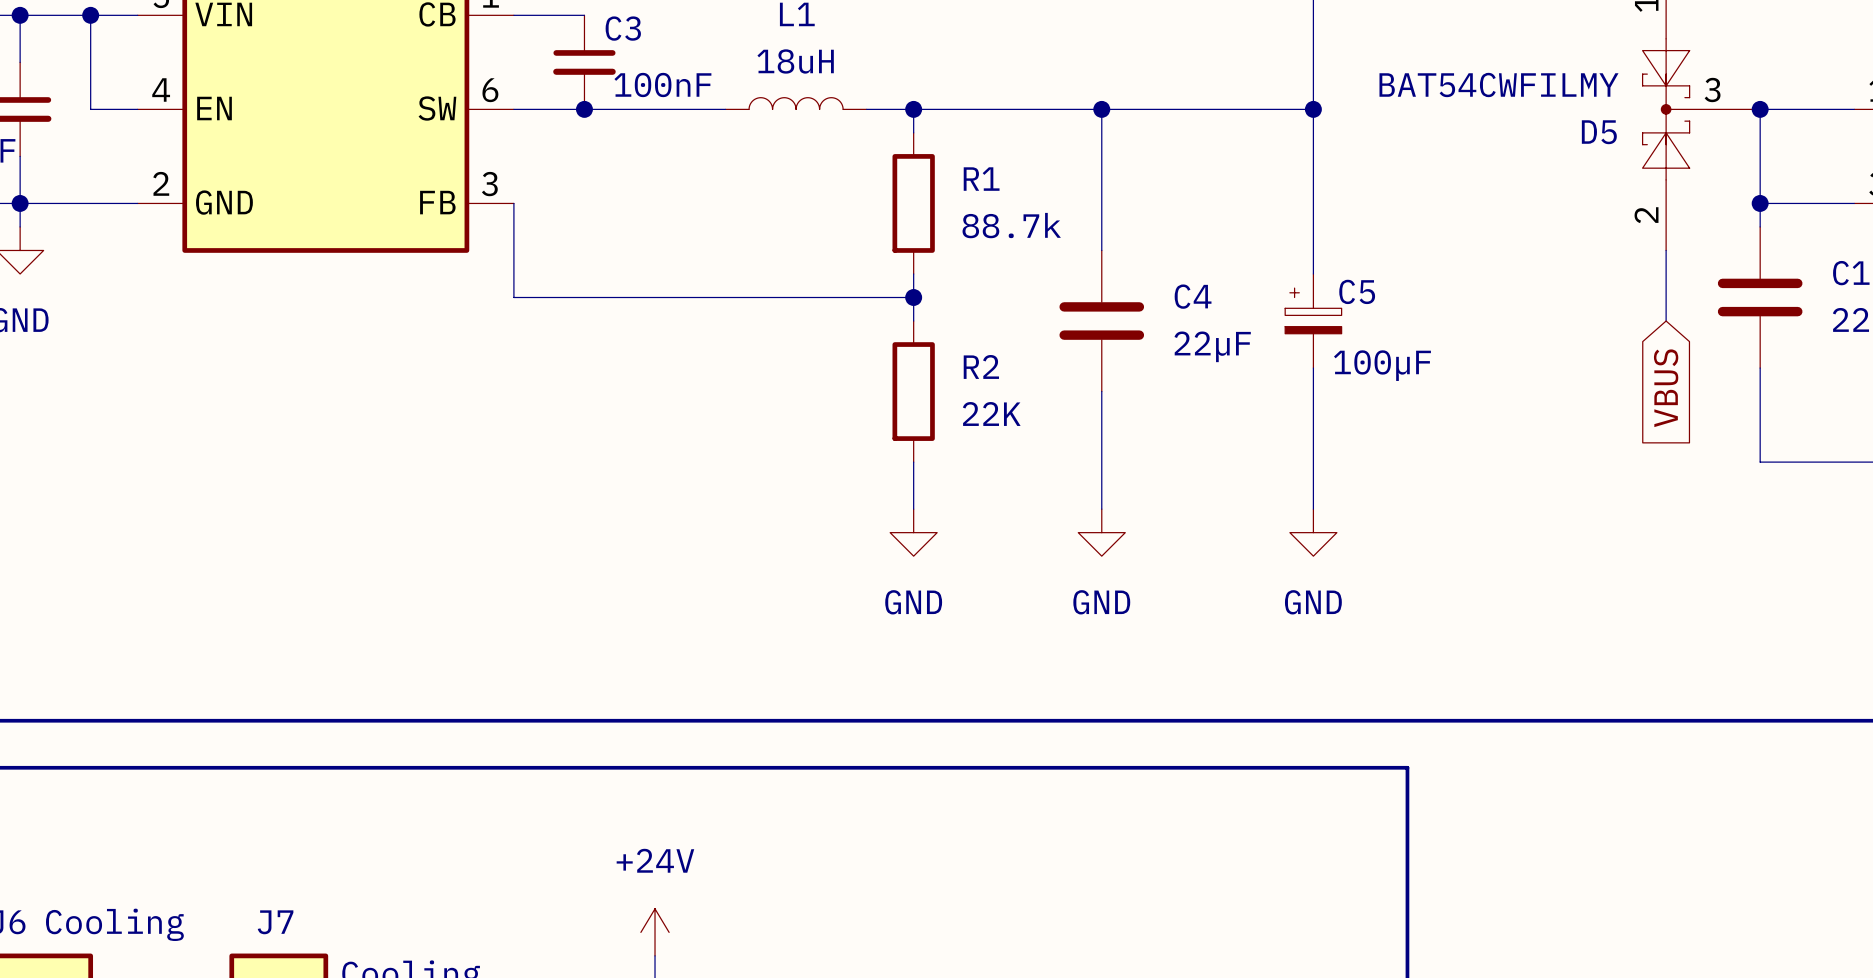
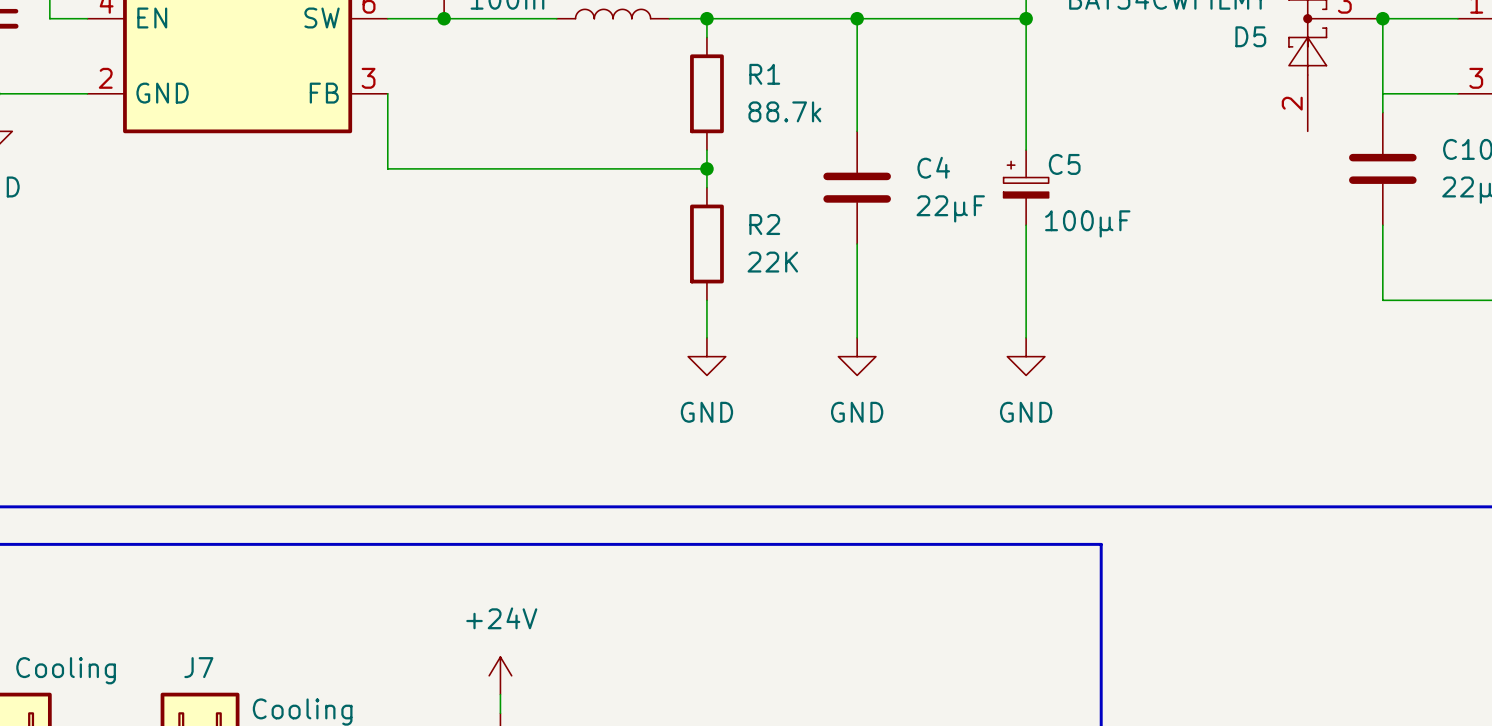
junction: (1760, 203) -> none
wire: (1666, 250) (1666, 321) -> none
global label: VBUS (1666, 388) -> none

